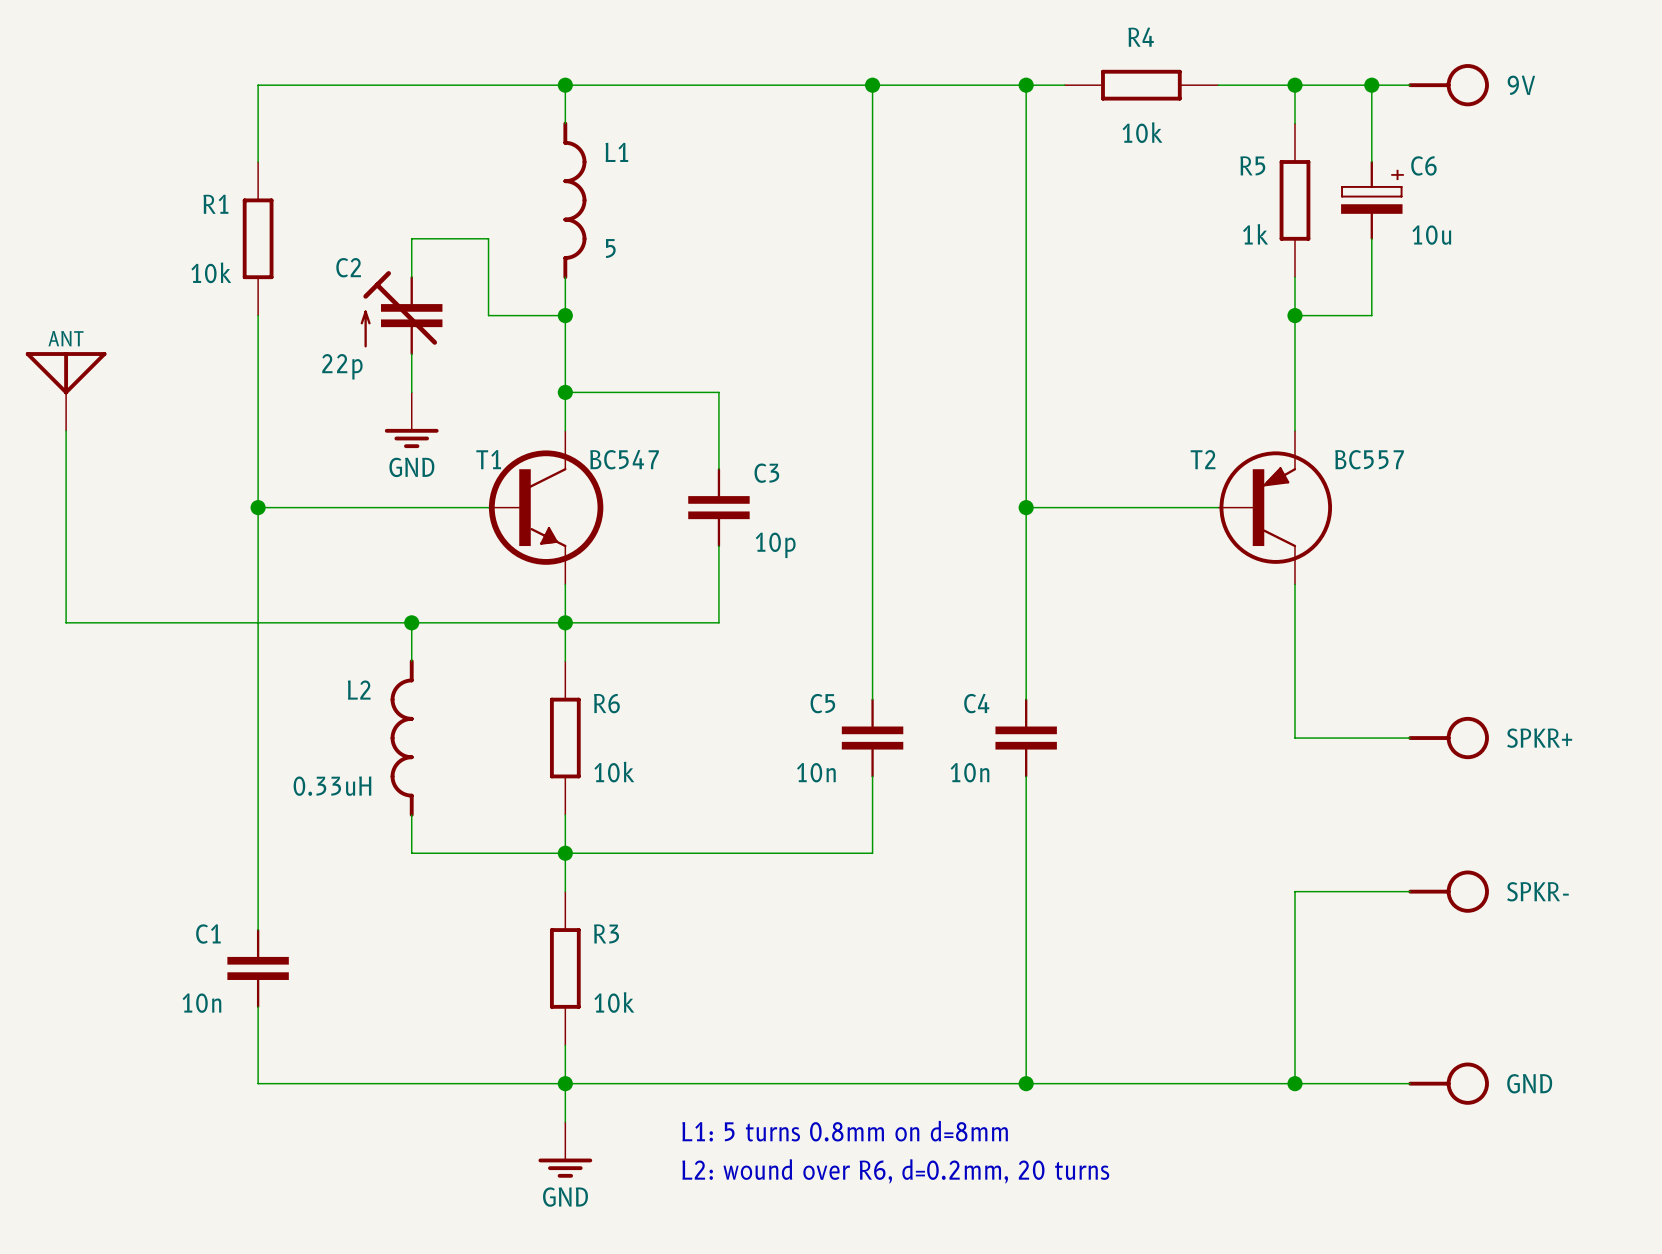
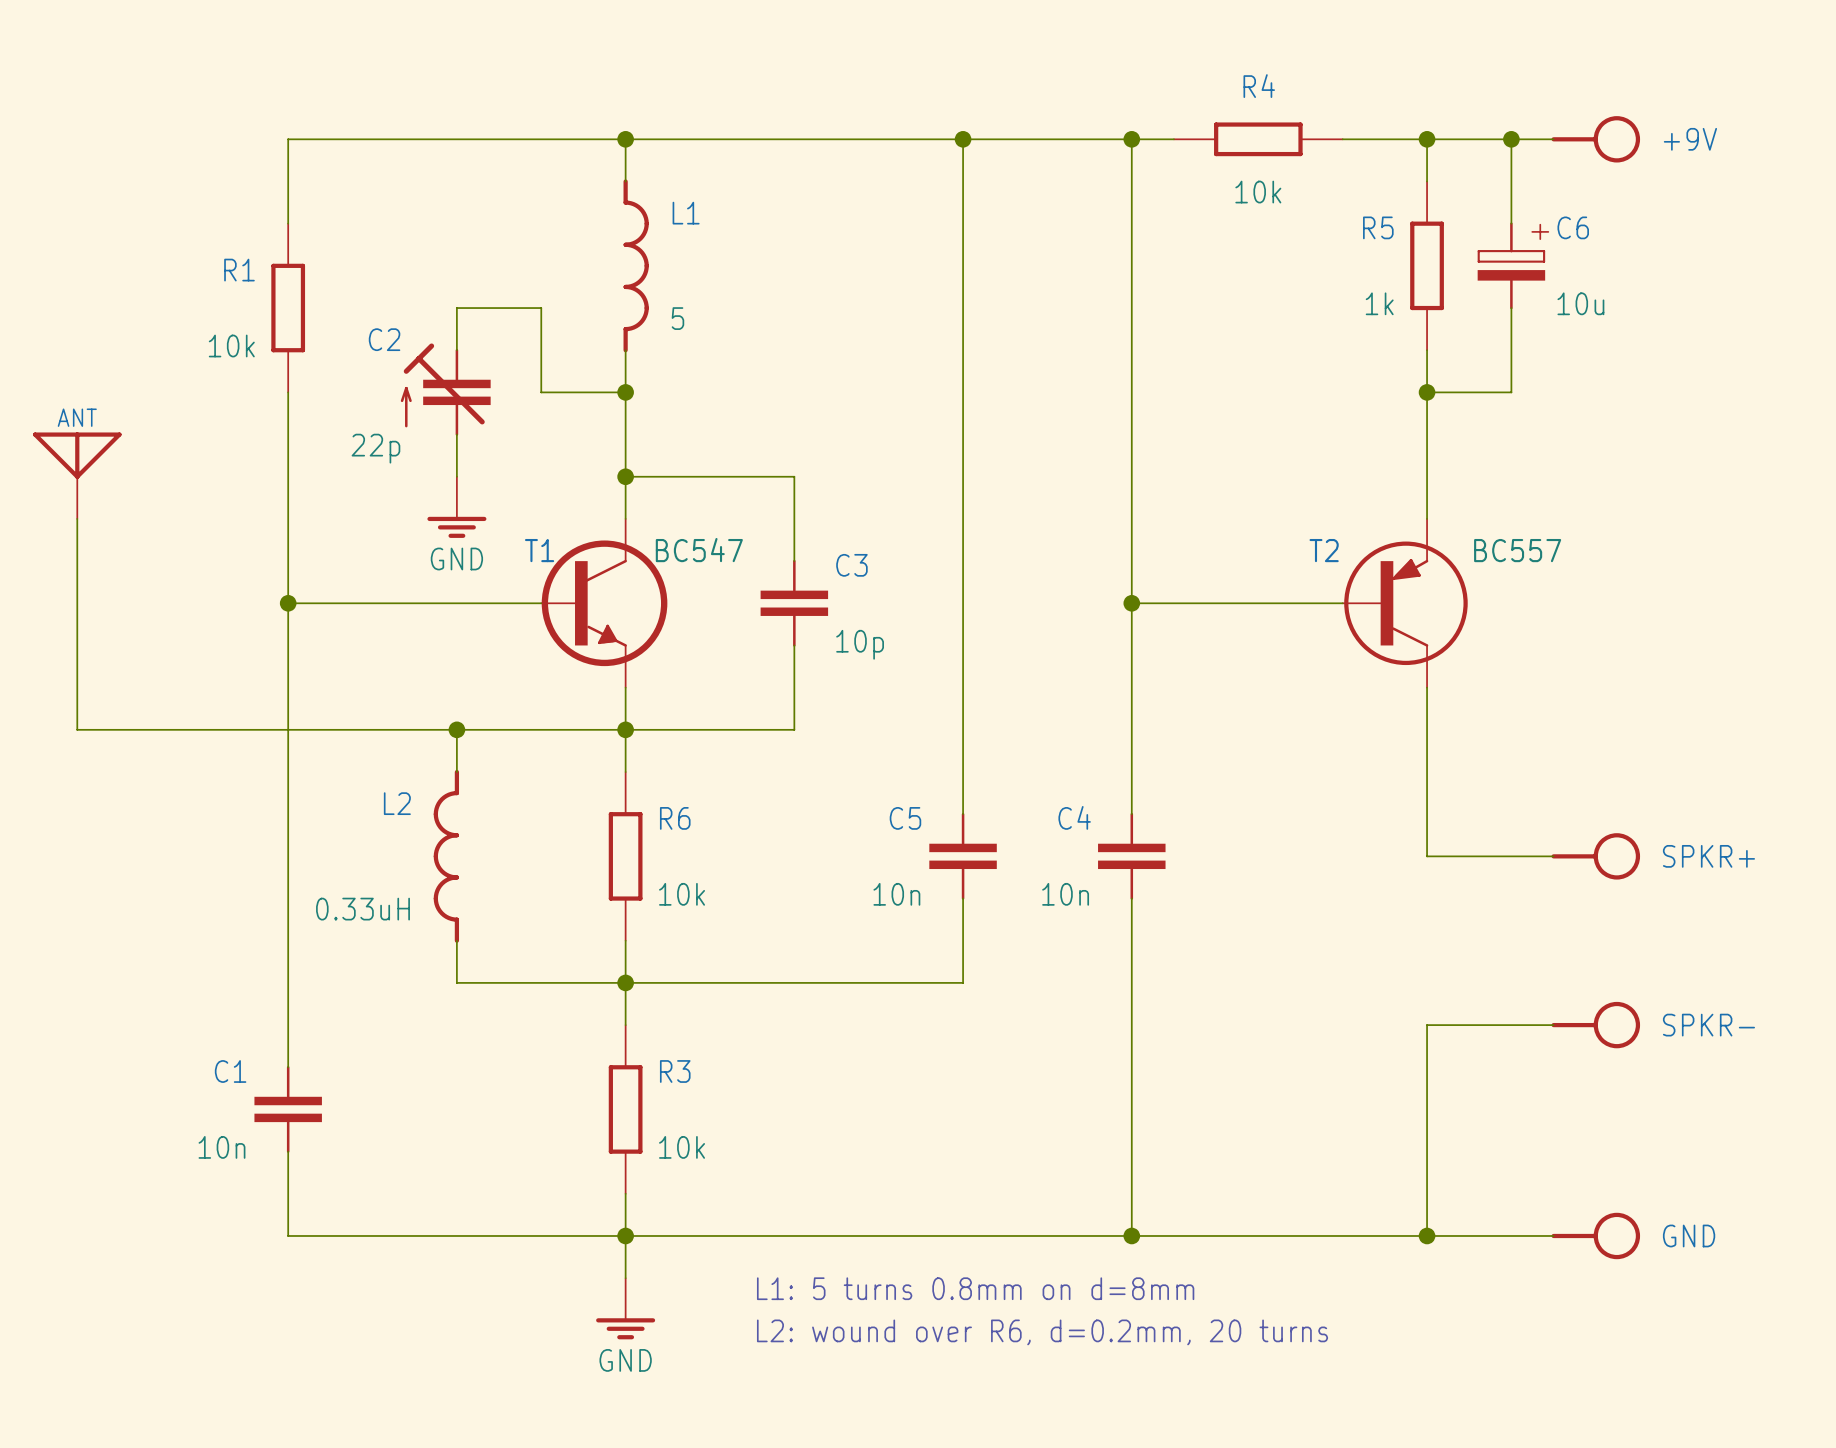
9V name: 9V (1521, 85) -> +9V (1690, 139)

